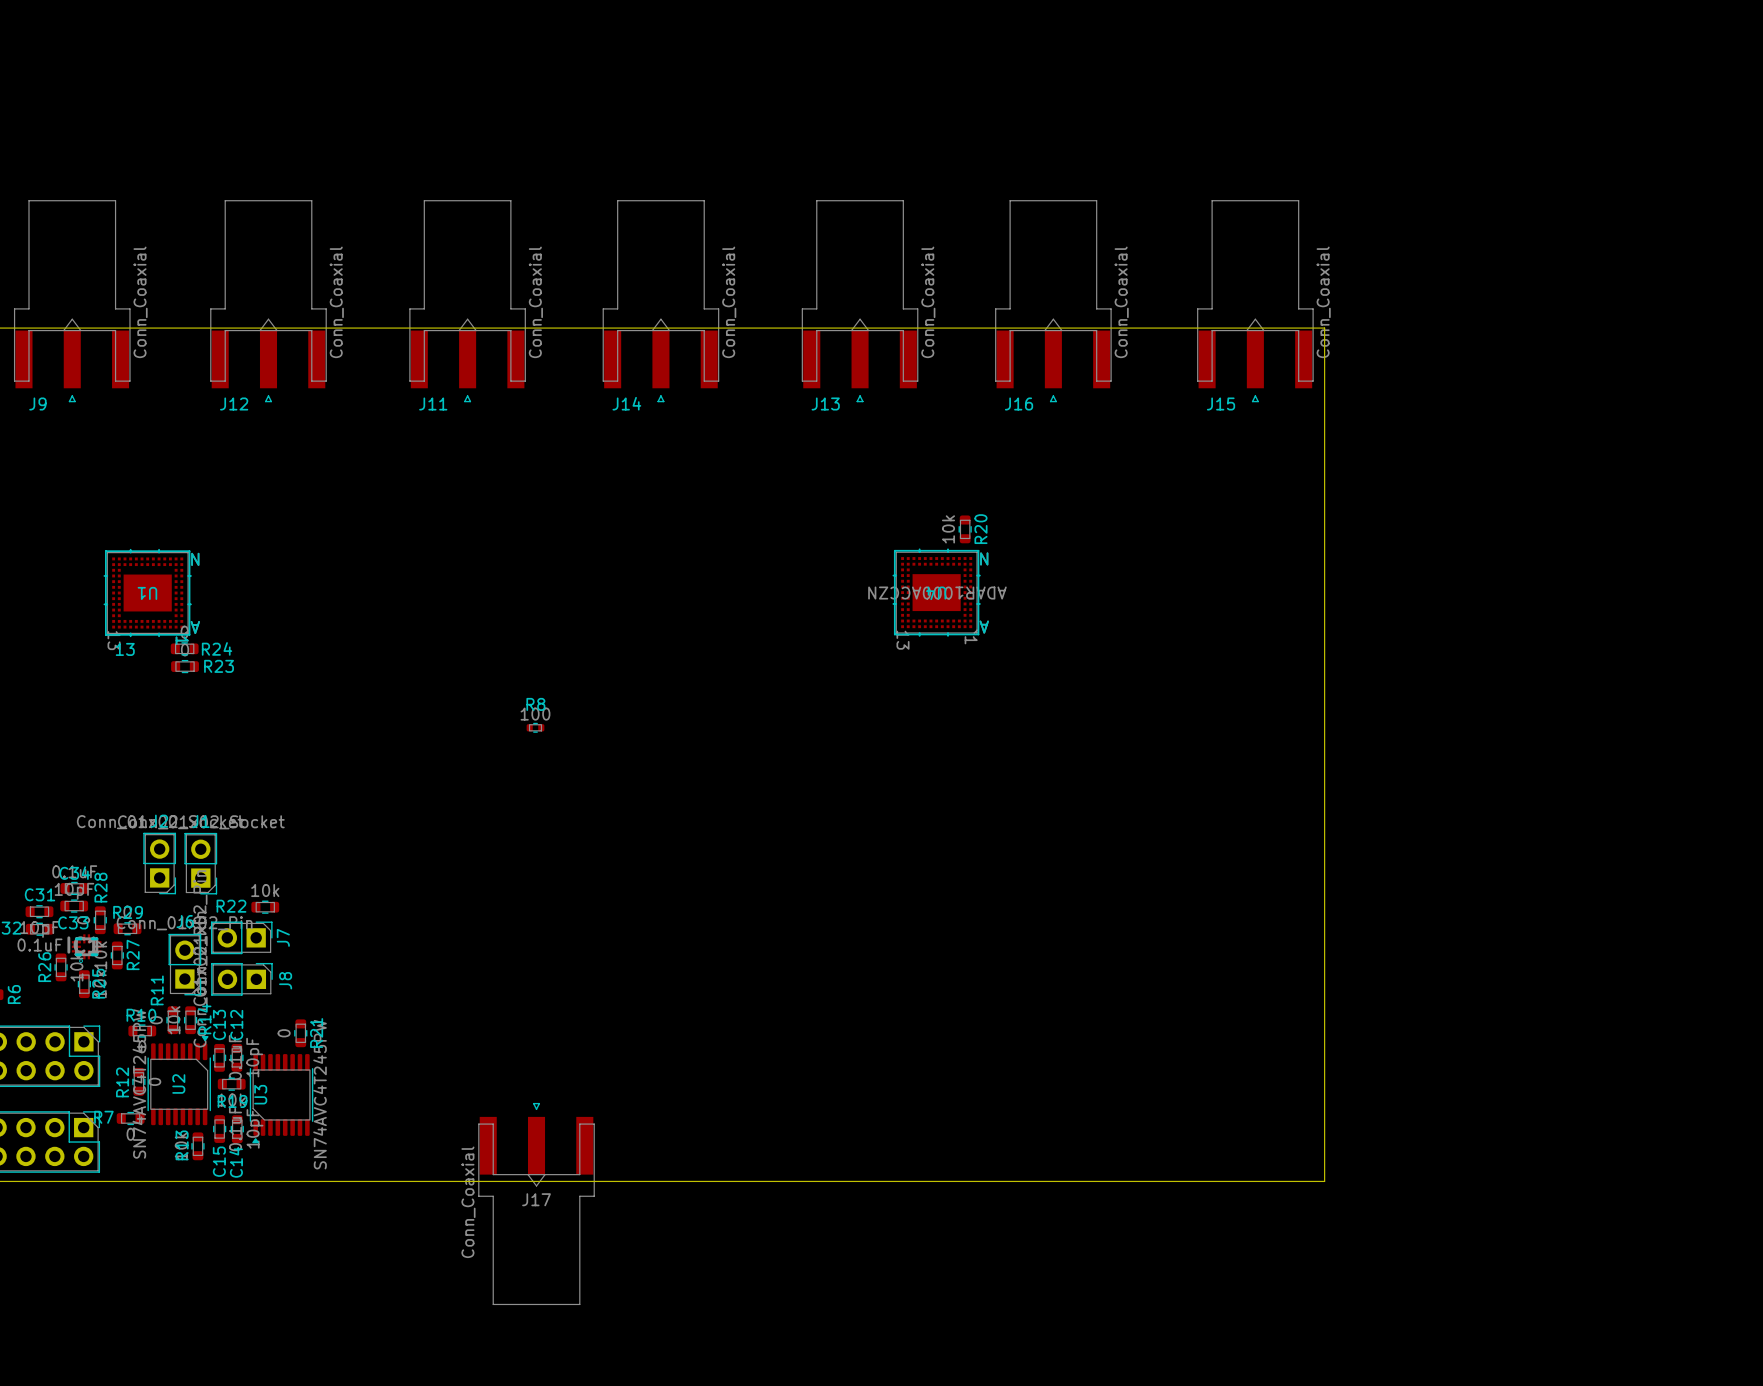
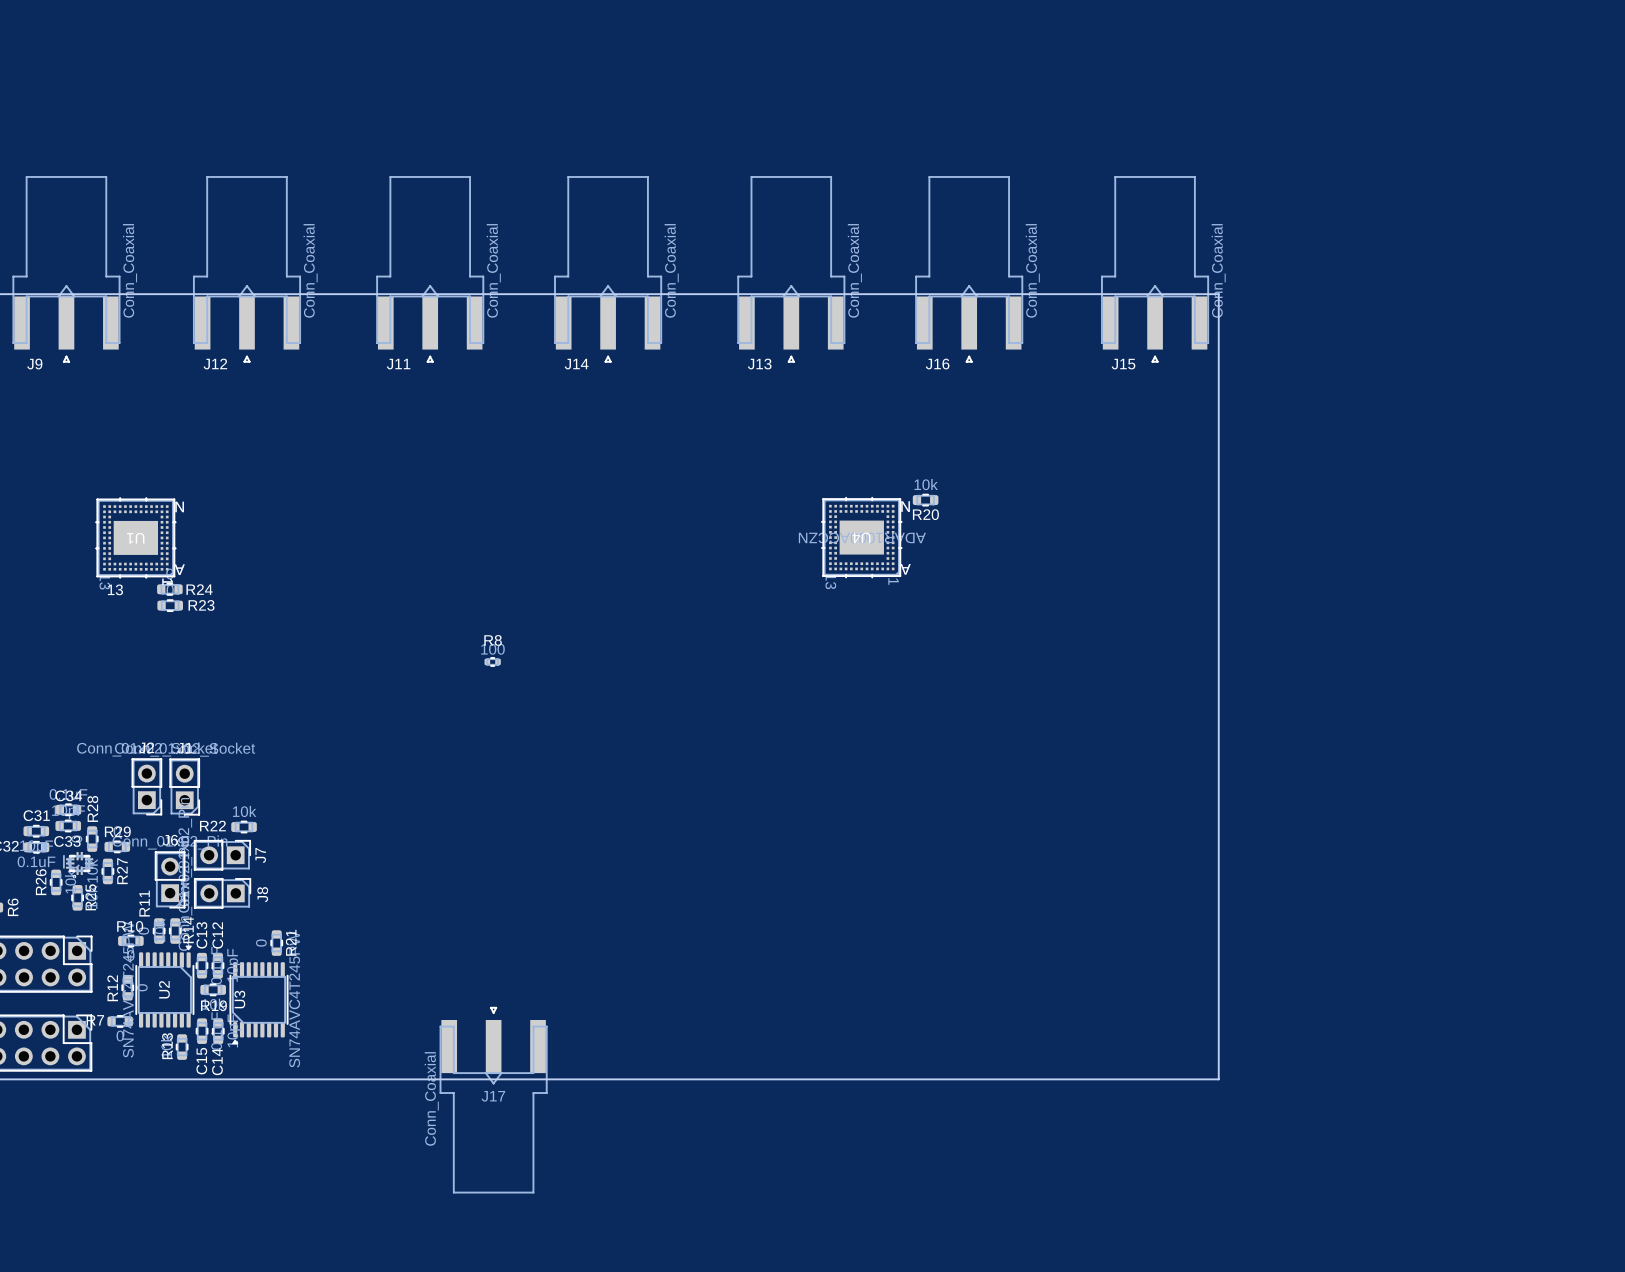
R20 rotation: 0° (965, 529) -> 90° clockwise (925, 500)
R20 position: (965, 529) -> (925, 500)

